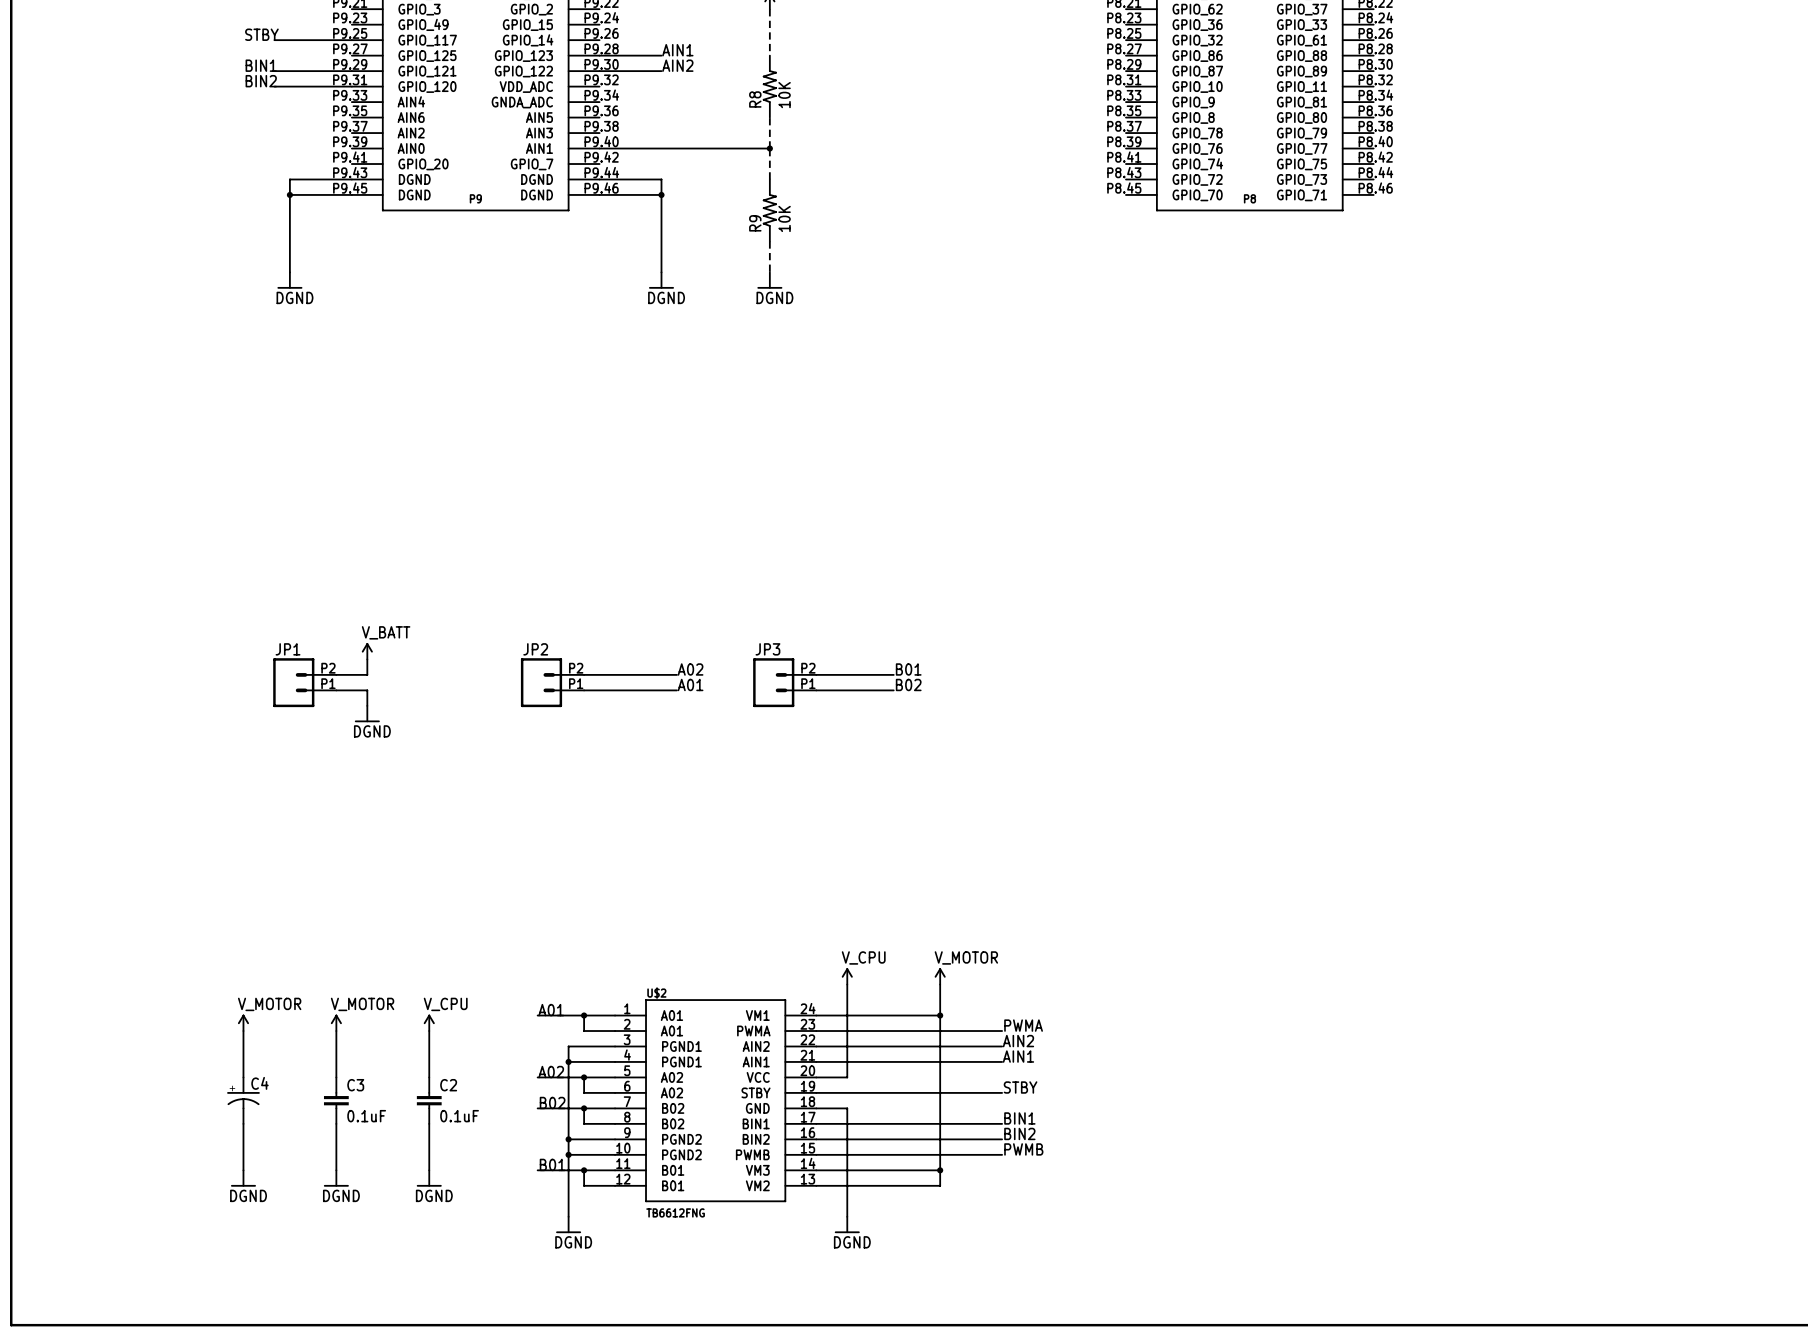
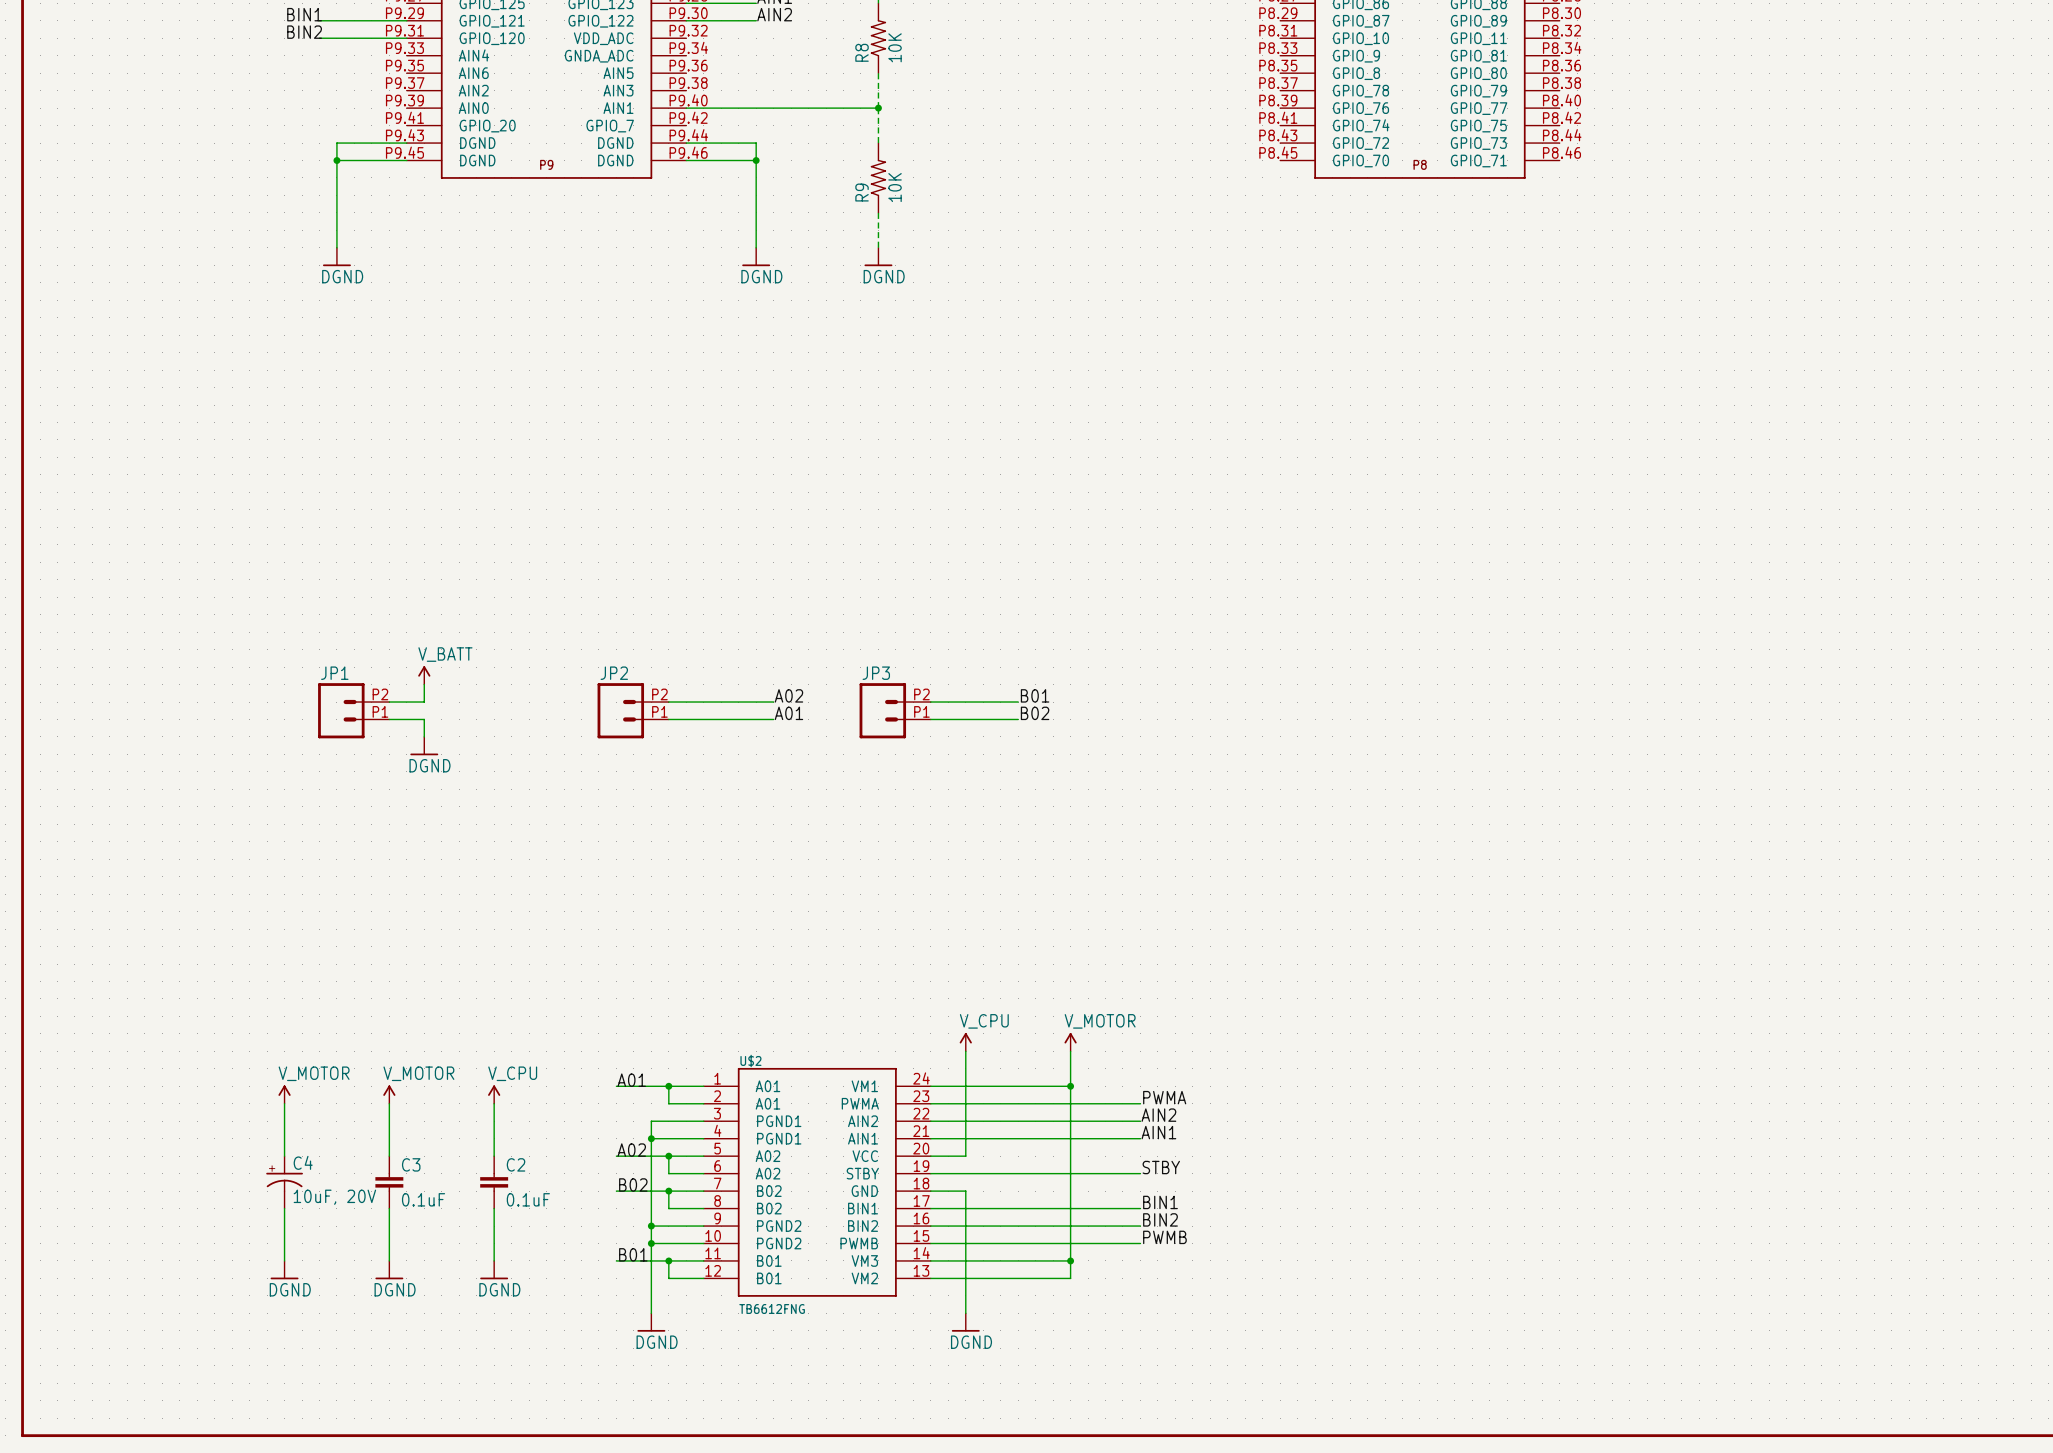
C4 value: none -> 10uF, 20V (334, 1197)

